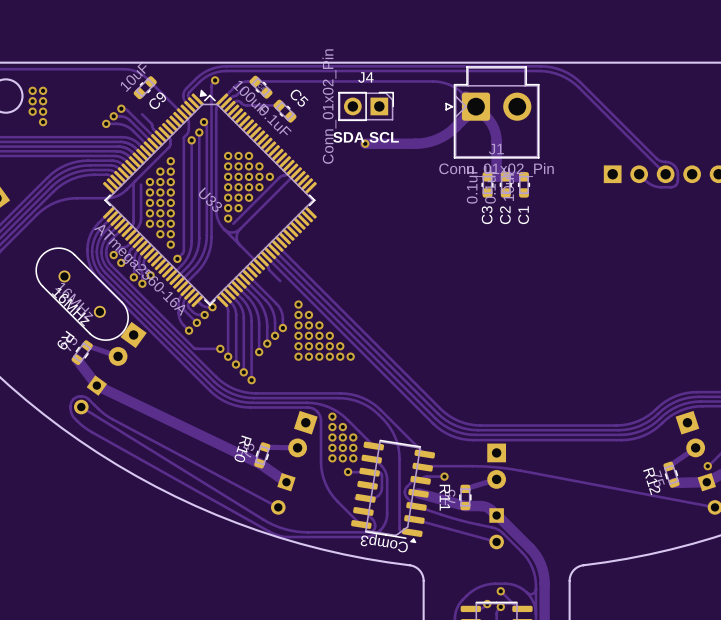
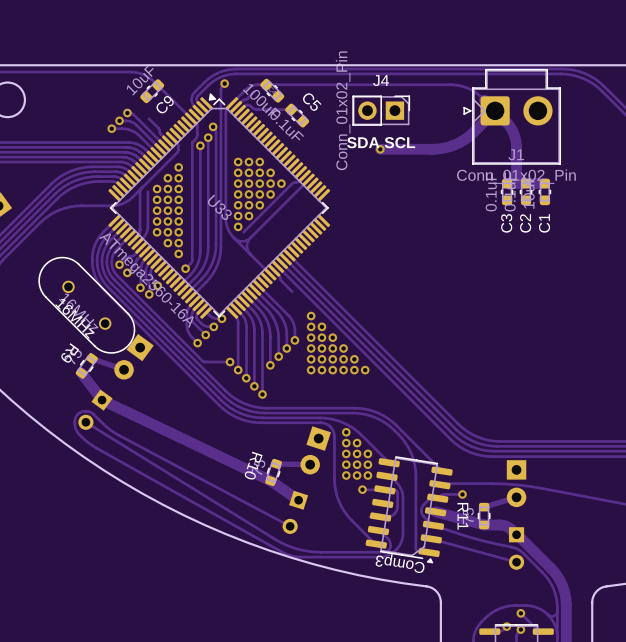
via: (32, 90) -> none
via: (43, 90) -> none
via: (32, 101) -> none
via: (43, 101) -> none
via: (32, 111) -> none
via: (43, 111) -> none
via: (43, 122) -> none

